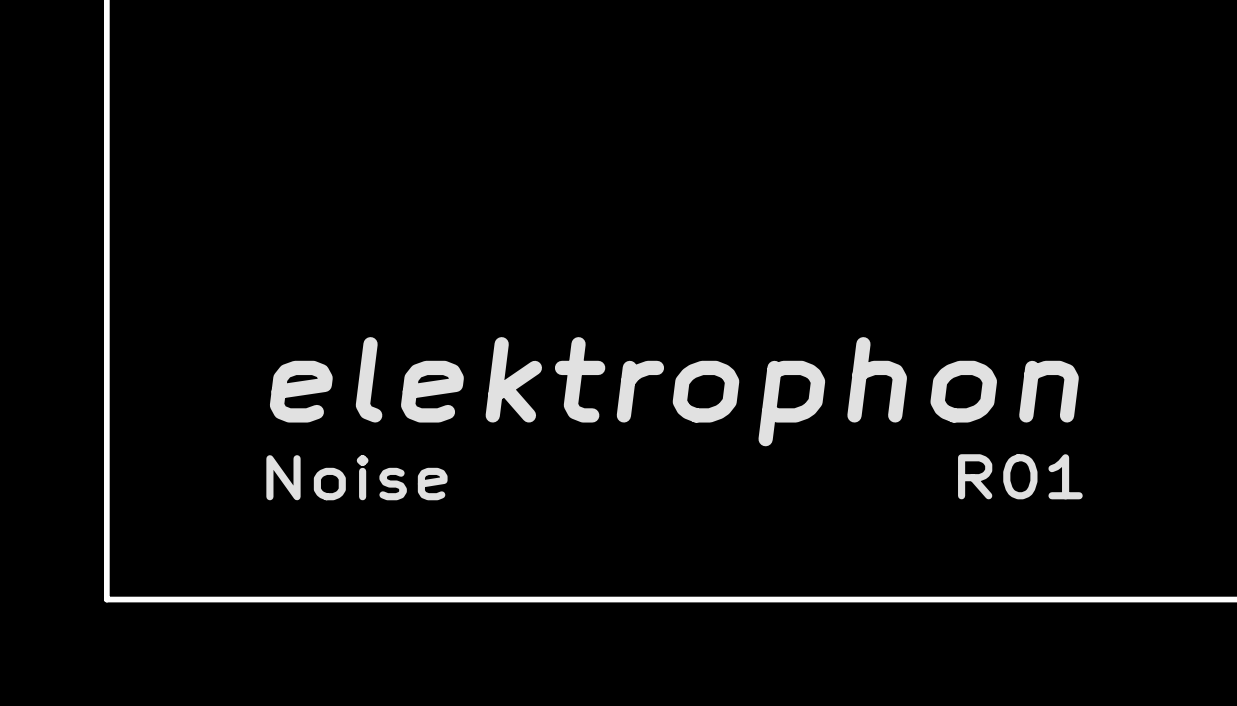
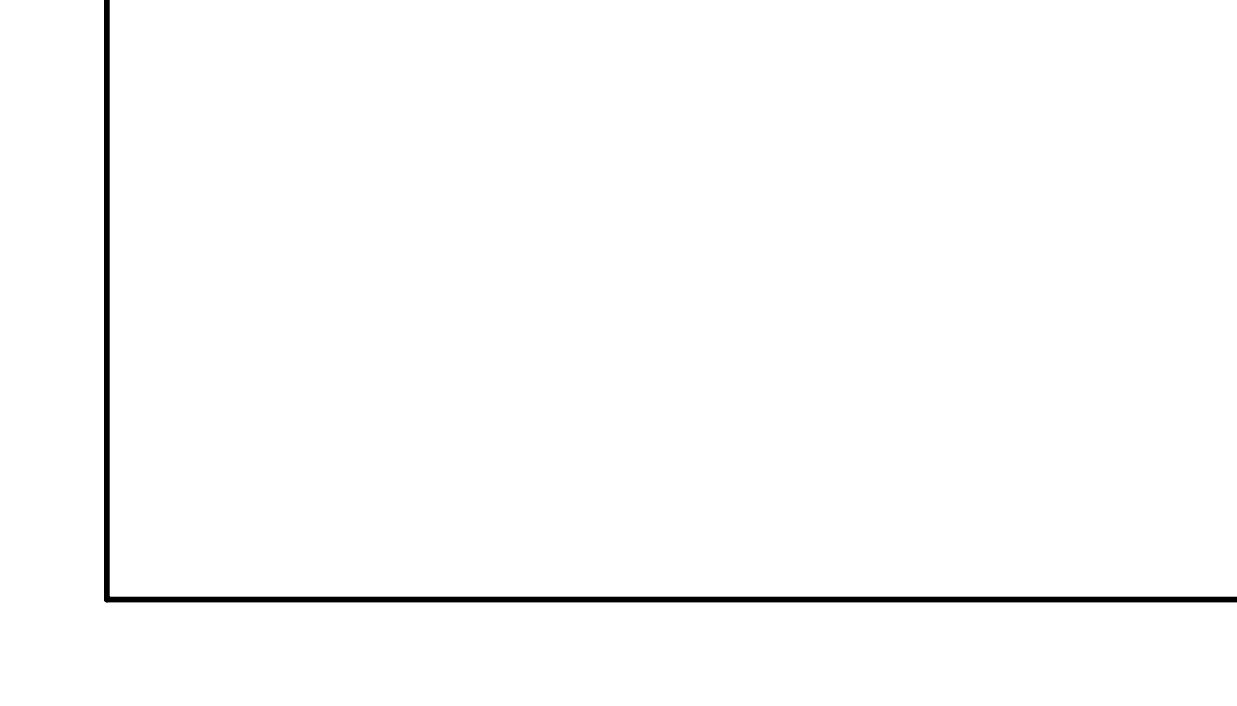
drawing: [266, 337, 1083, 501] -> none

